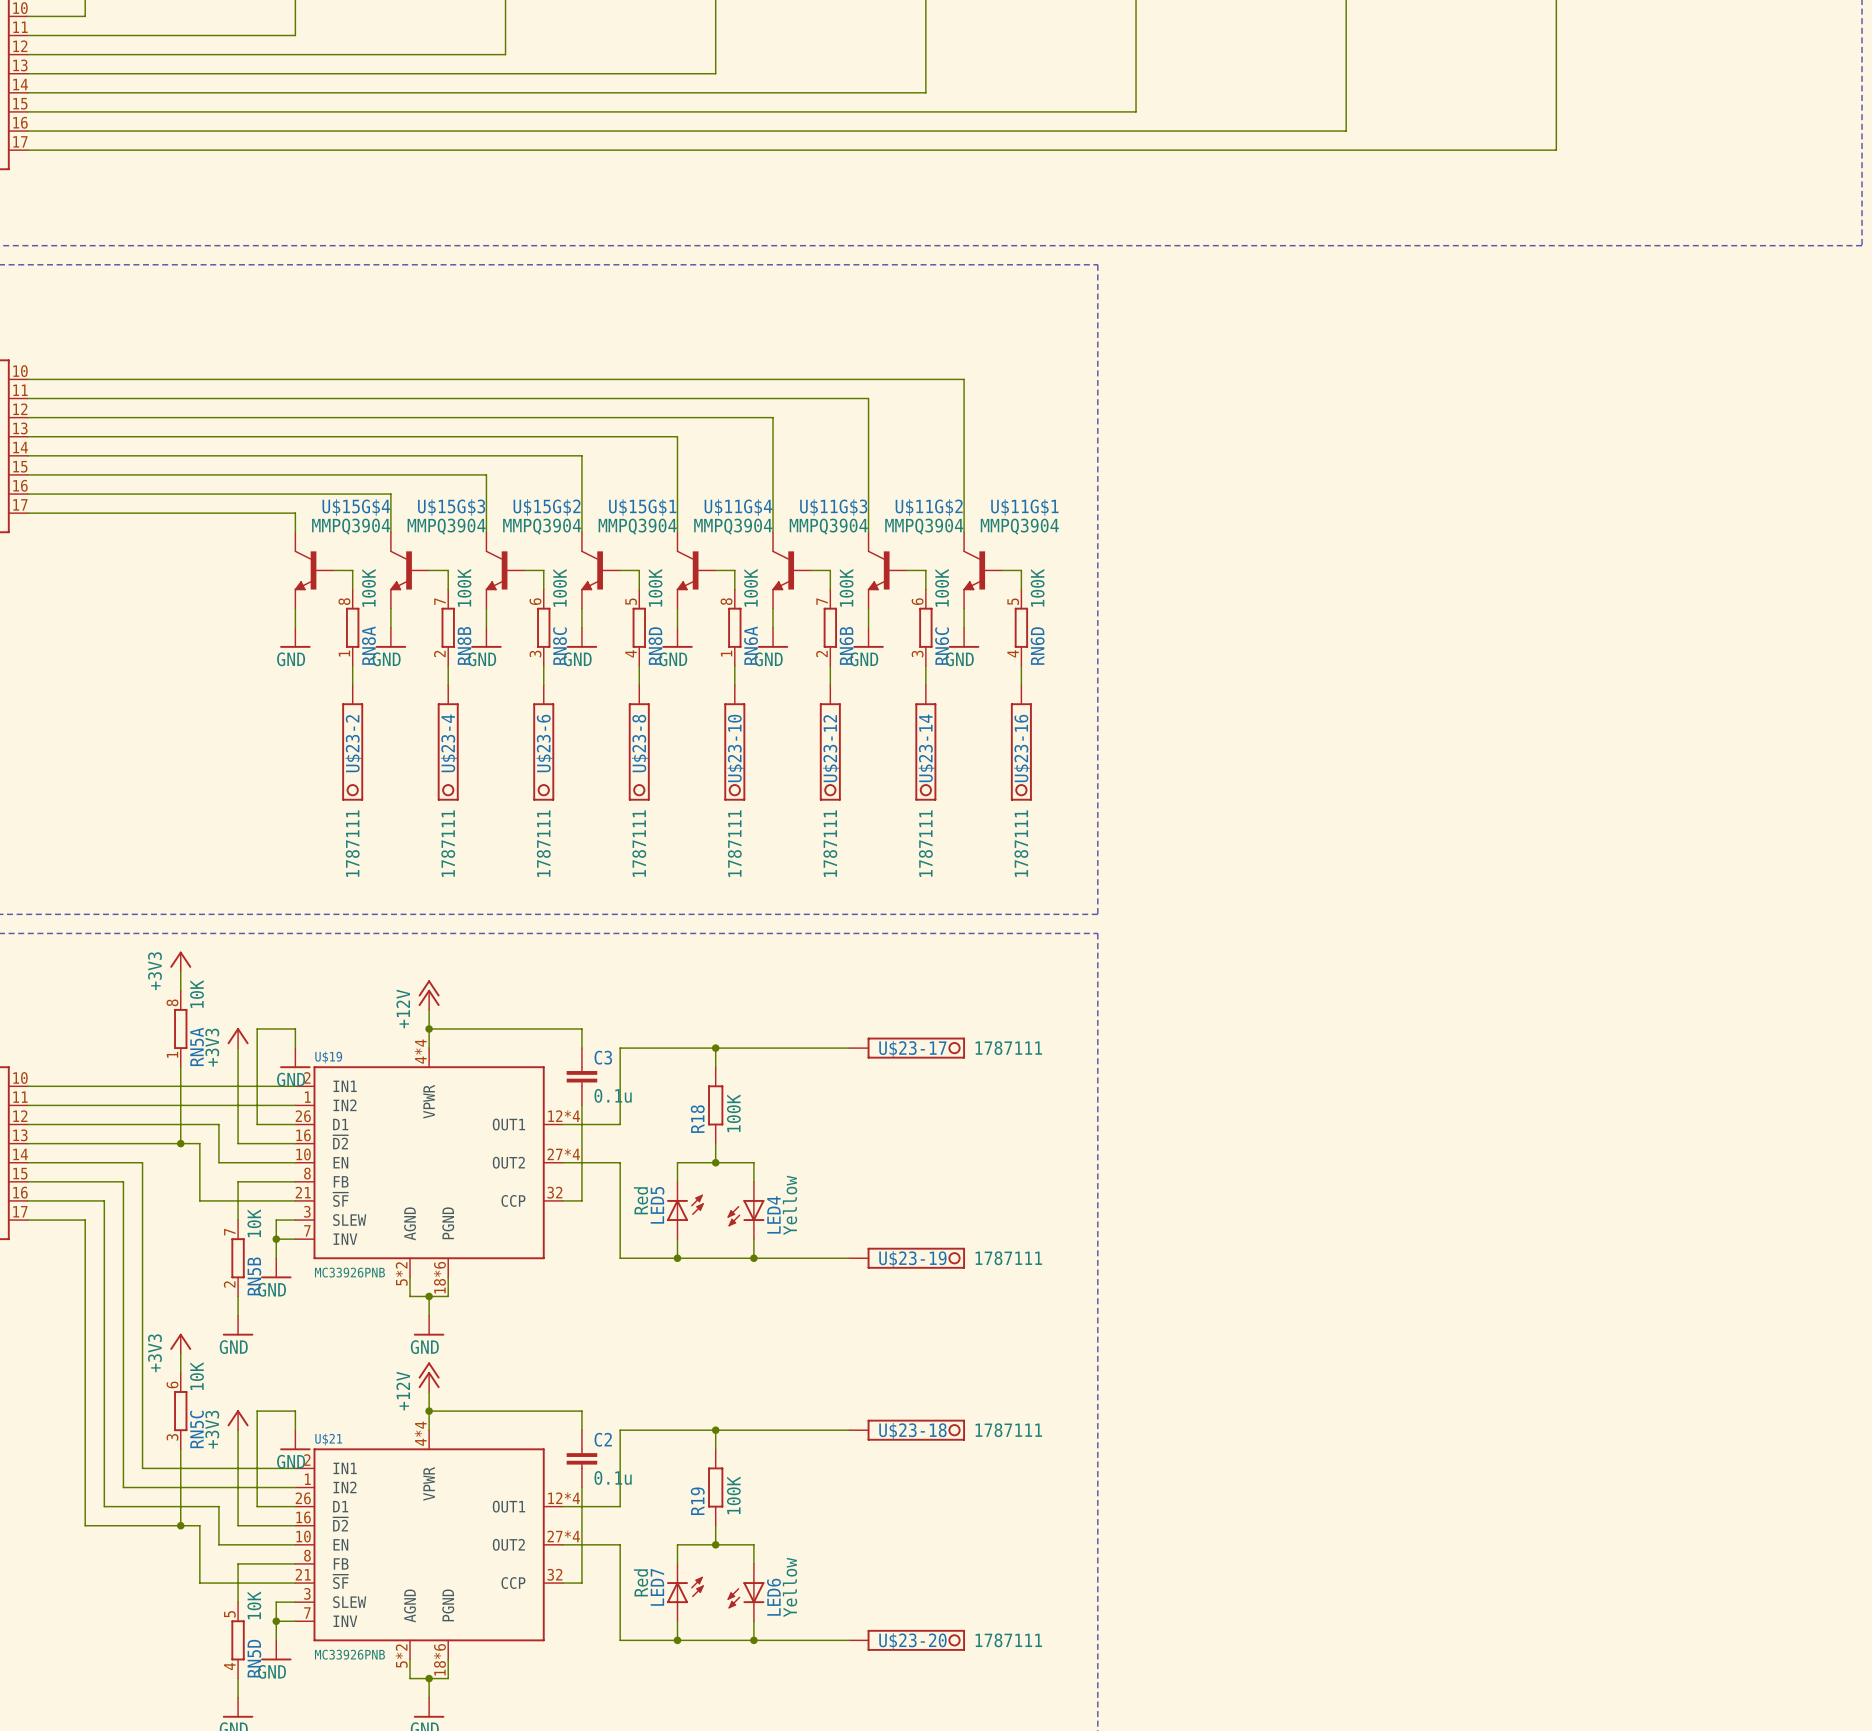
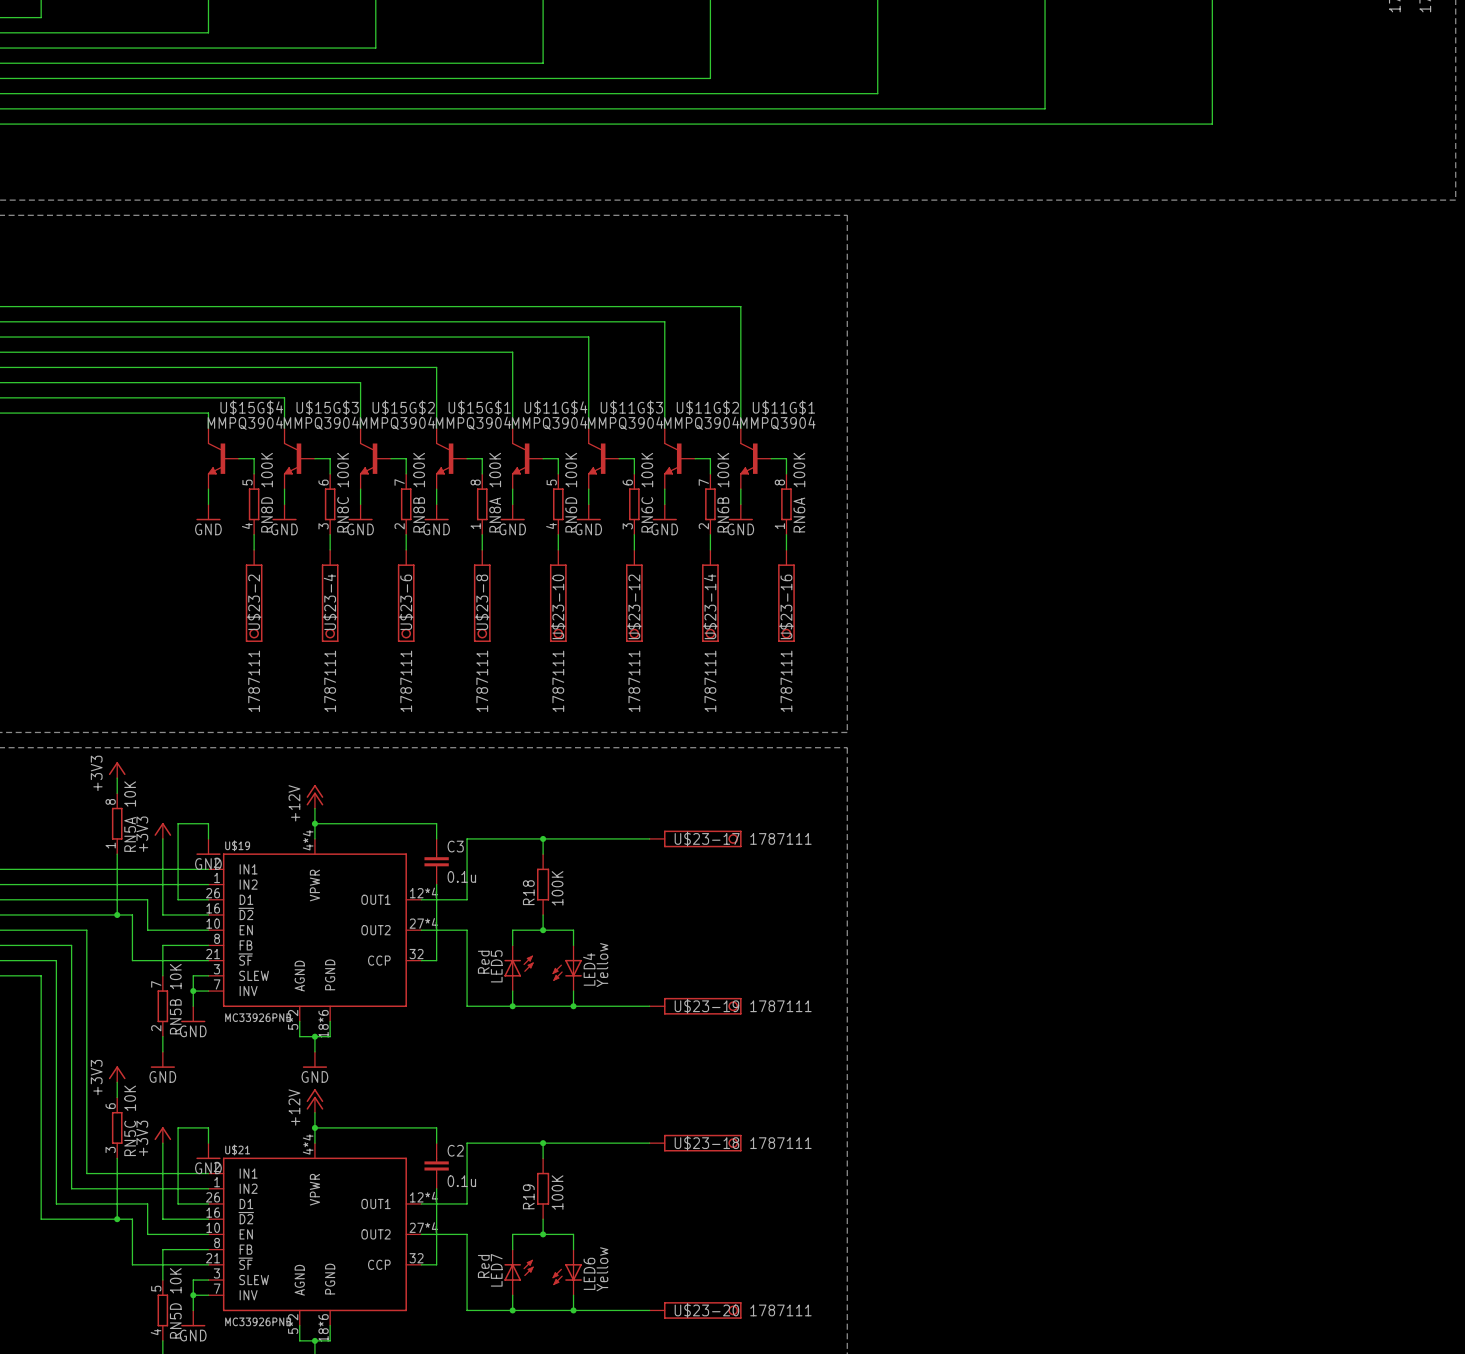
RN8A position: (352, 627) -> (482, 504)
RN8B position: (448, 627) -> (406, 504)
RN8C position: (543, 627) -> (330, 504)
RN8D position: (639, 627) -> (254, 504)
RN6A position: (734, 627) -> (786, 504)
RN6B position: (830, 627) -> (710, 504)
RN6C position: (925, 627) -> (634, 504)
RN6D position: (1021, 627) -> (558, 504)

